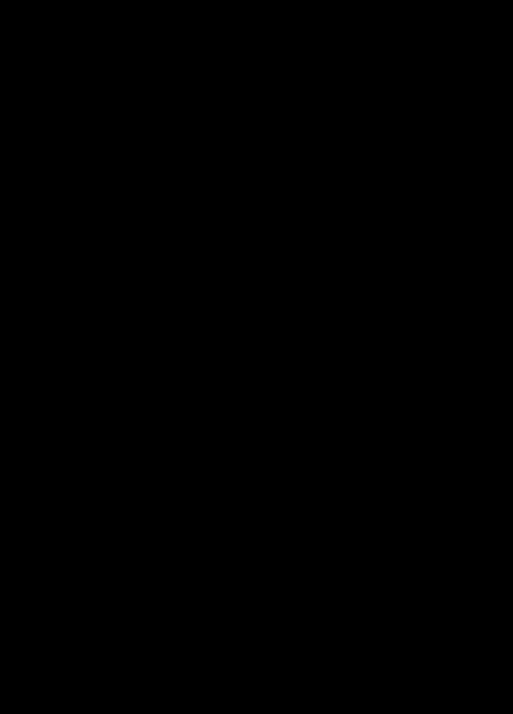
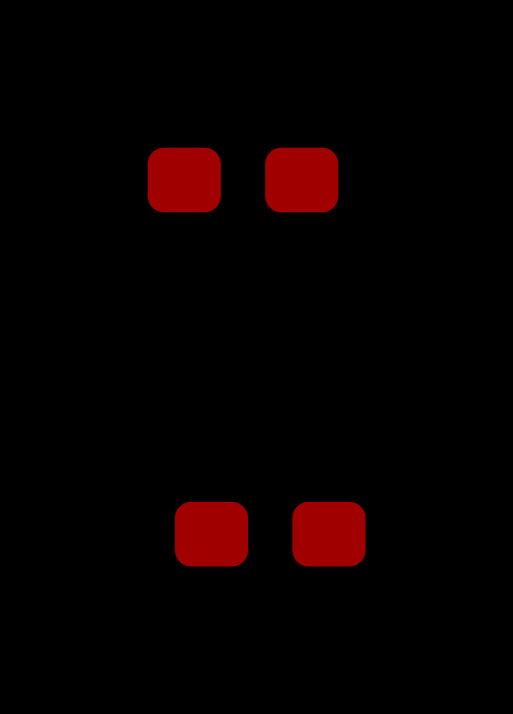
part: none -> (242, 179)
part: none -> (270, 534)

